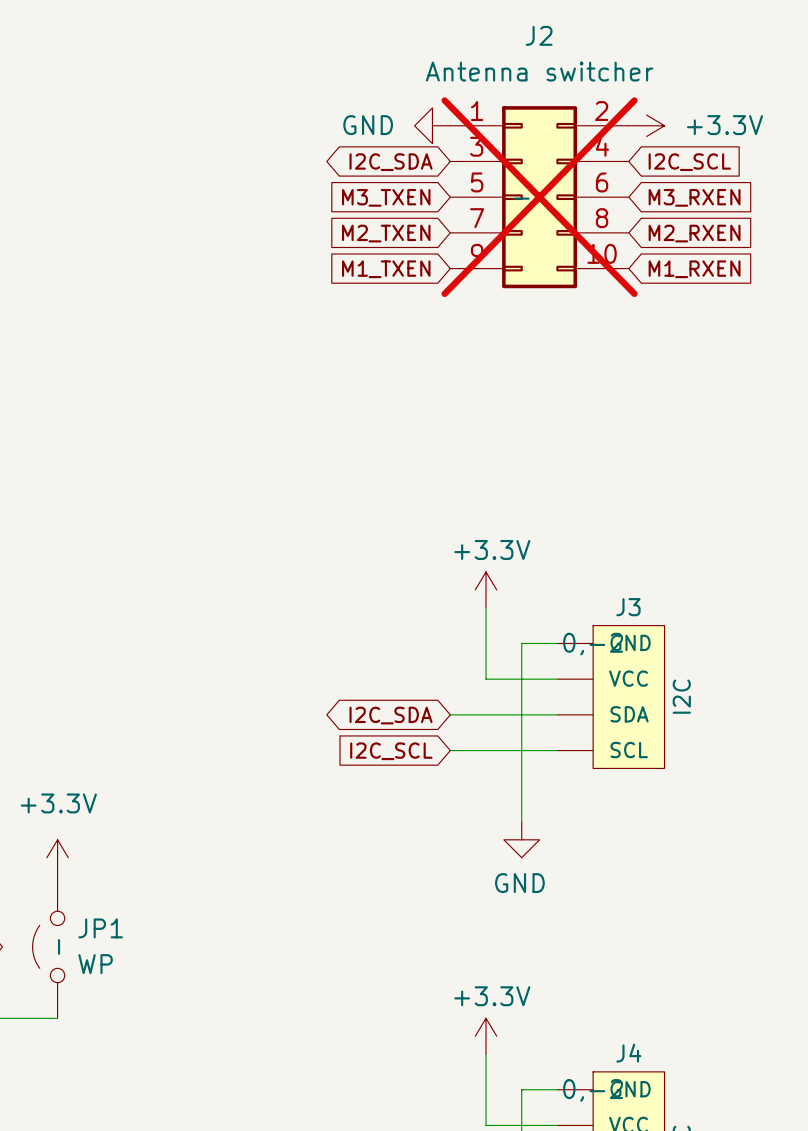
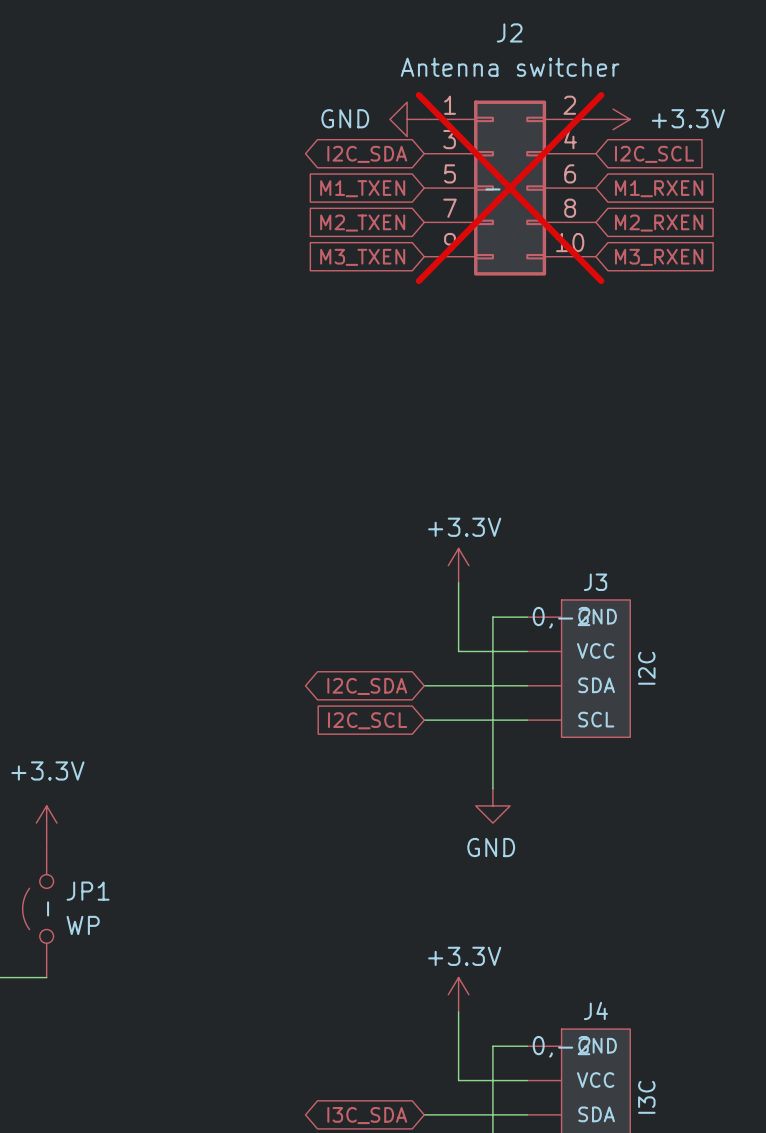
global label: M3_TXEN (386, 197) -> M1_TXEN (362, 188)
global label: M3_RXEN (694, 197) -> M1_RXEN (659, 188)
global label: M1_TXEN (386, 269) -> M3_TXEN (362, 257)
global label: M1_RXEN (694, 269) -> M3_RXEN (659, 257)

